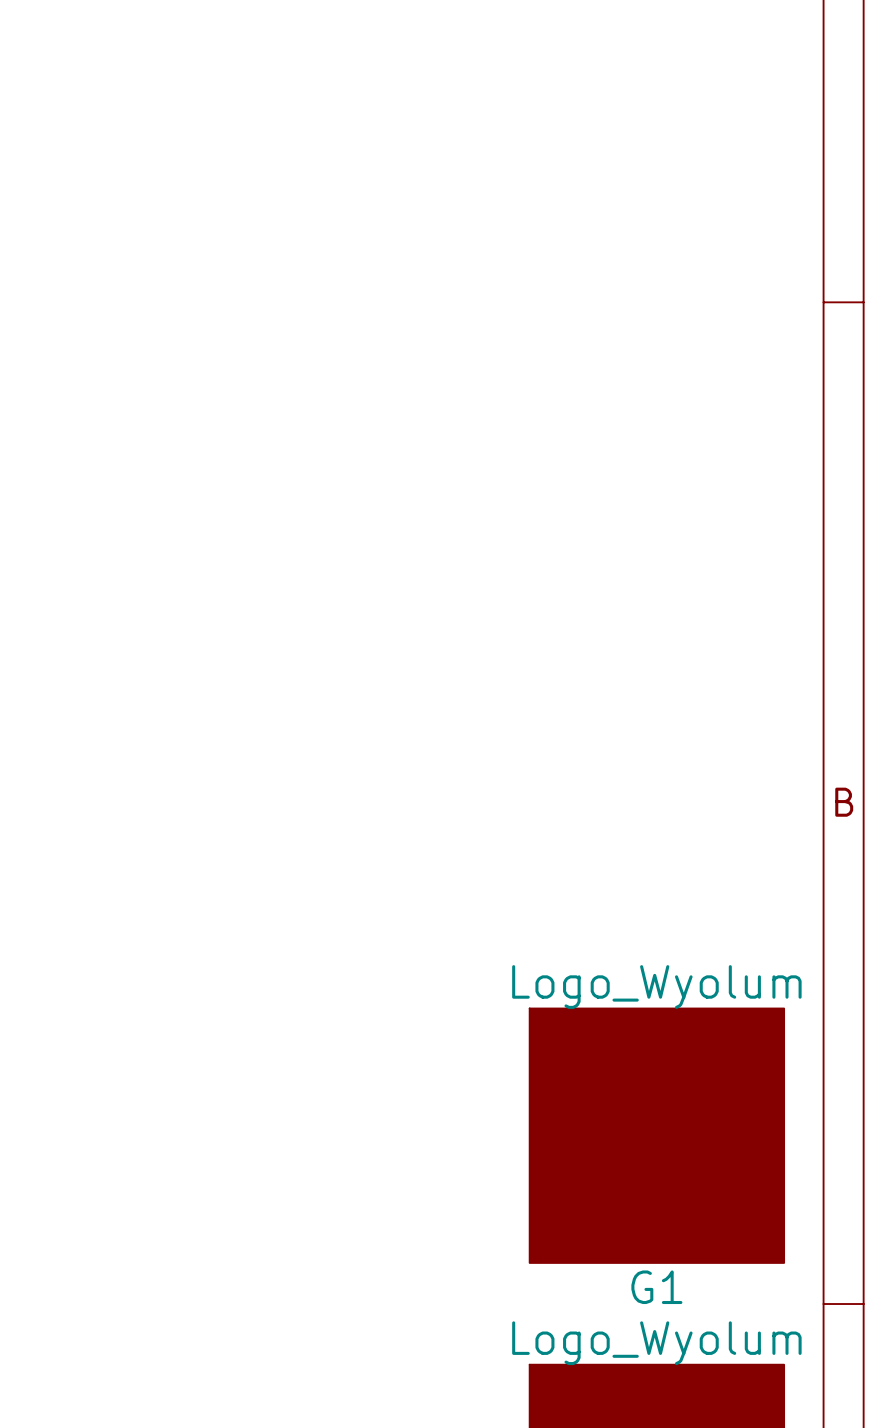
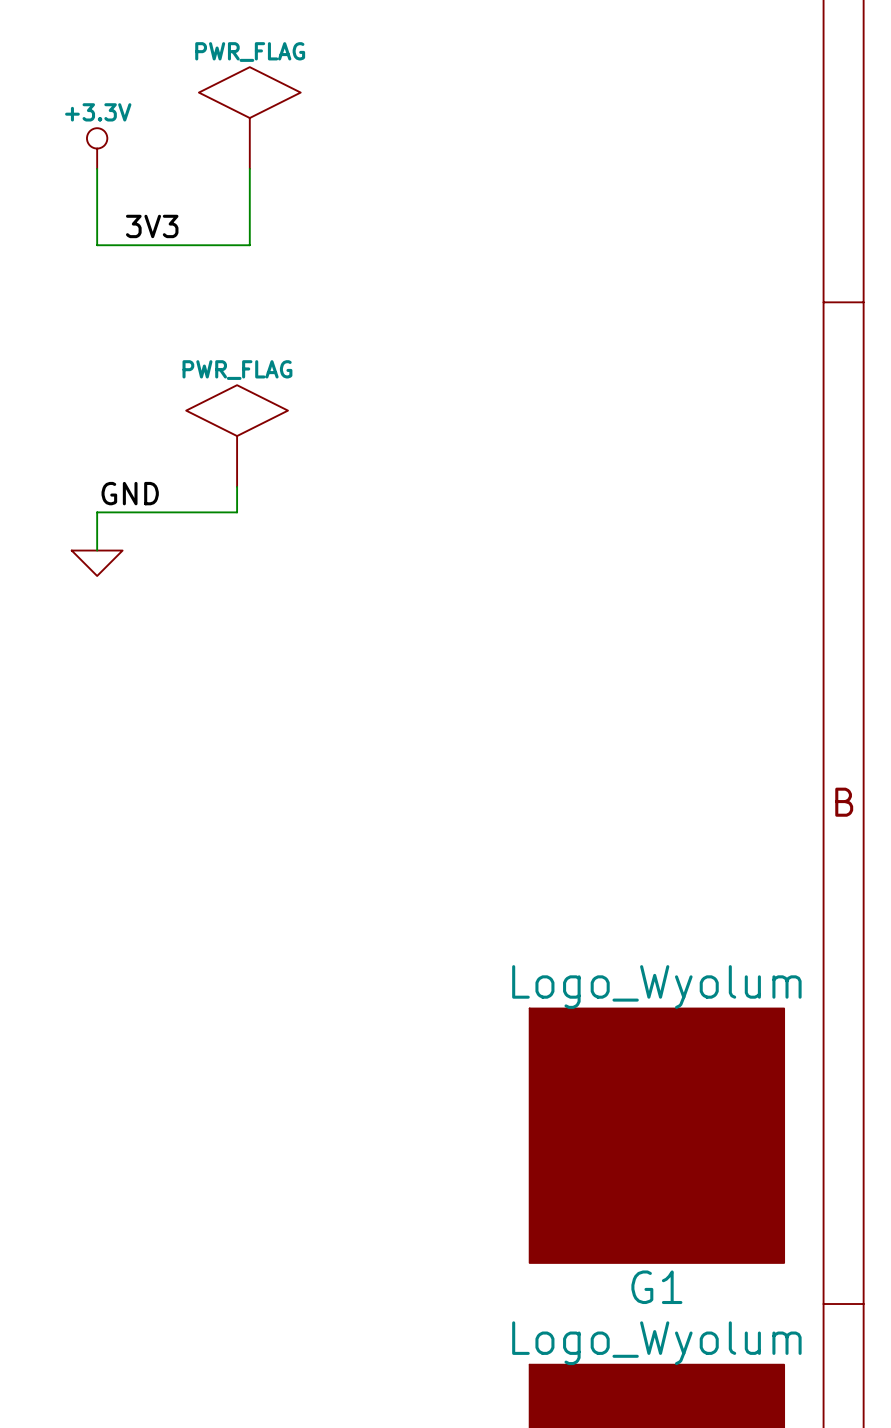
power symbol: none -> PWR_FLAG (249, 118)
power symbol: none -> +3.3V (97, 148)
wire: none -> (97, 168) (97, 245) (249, 245) (249, 168)
label: none -> 3V3 (152, 226)
power symbol: none -> PWR_FLAG (237, 436)
wire: none -> (237, 486) (237, 512) (97, 512) (97, 550)
label: none -> GND (130, 493)
power symbol: none -> (97, 563)

